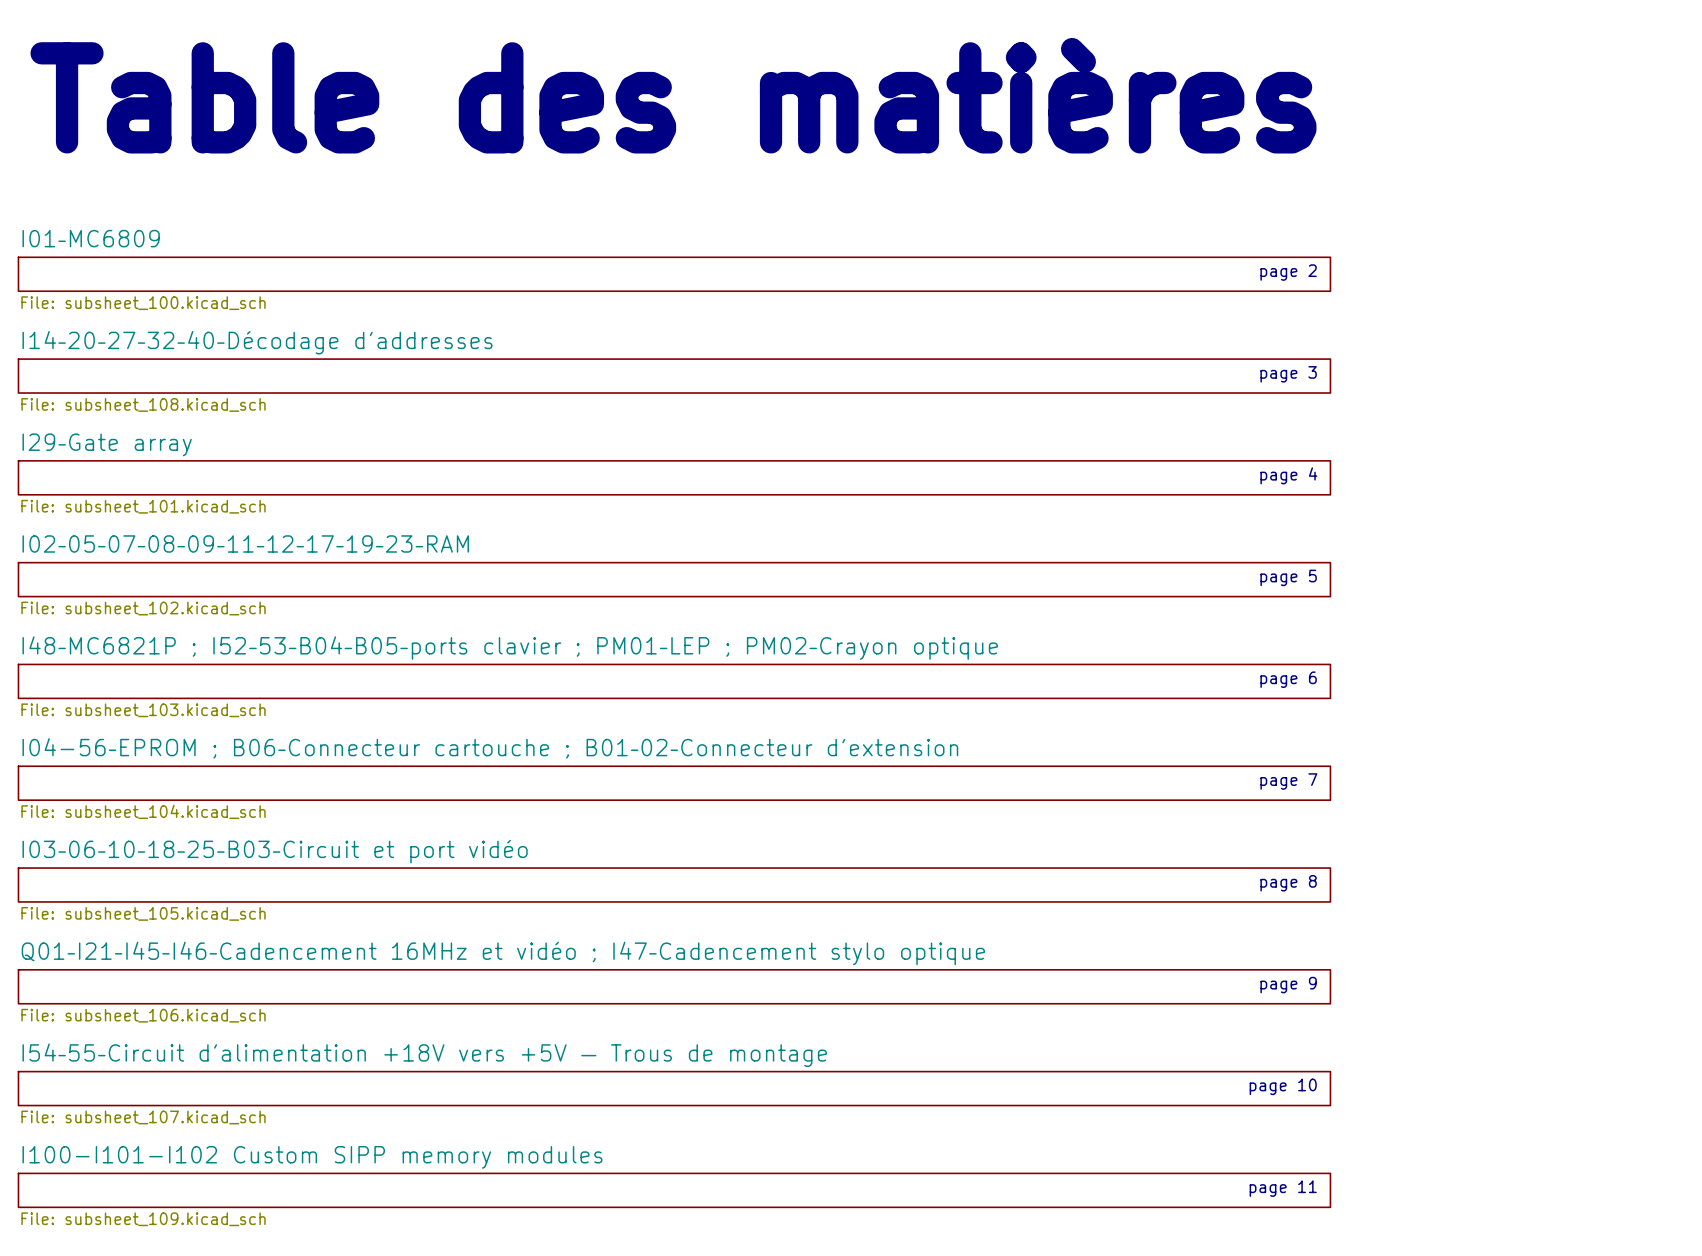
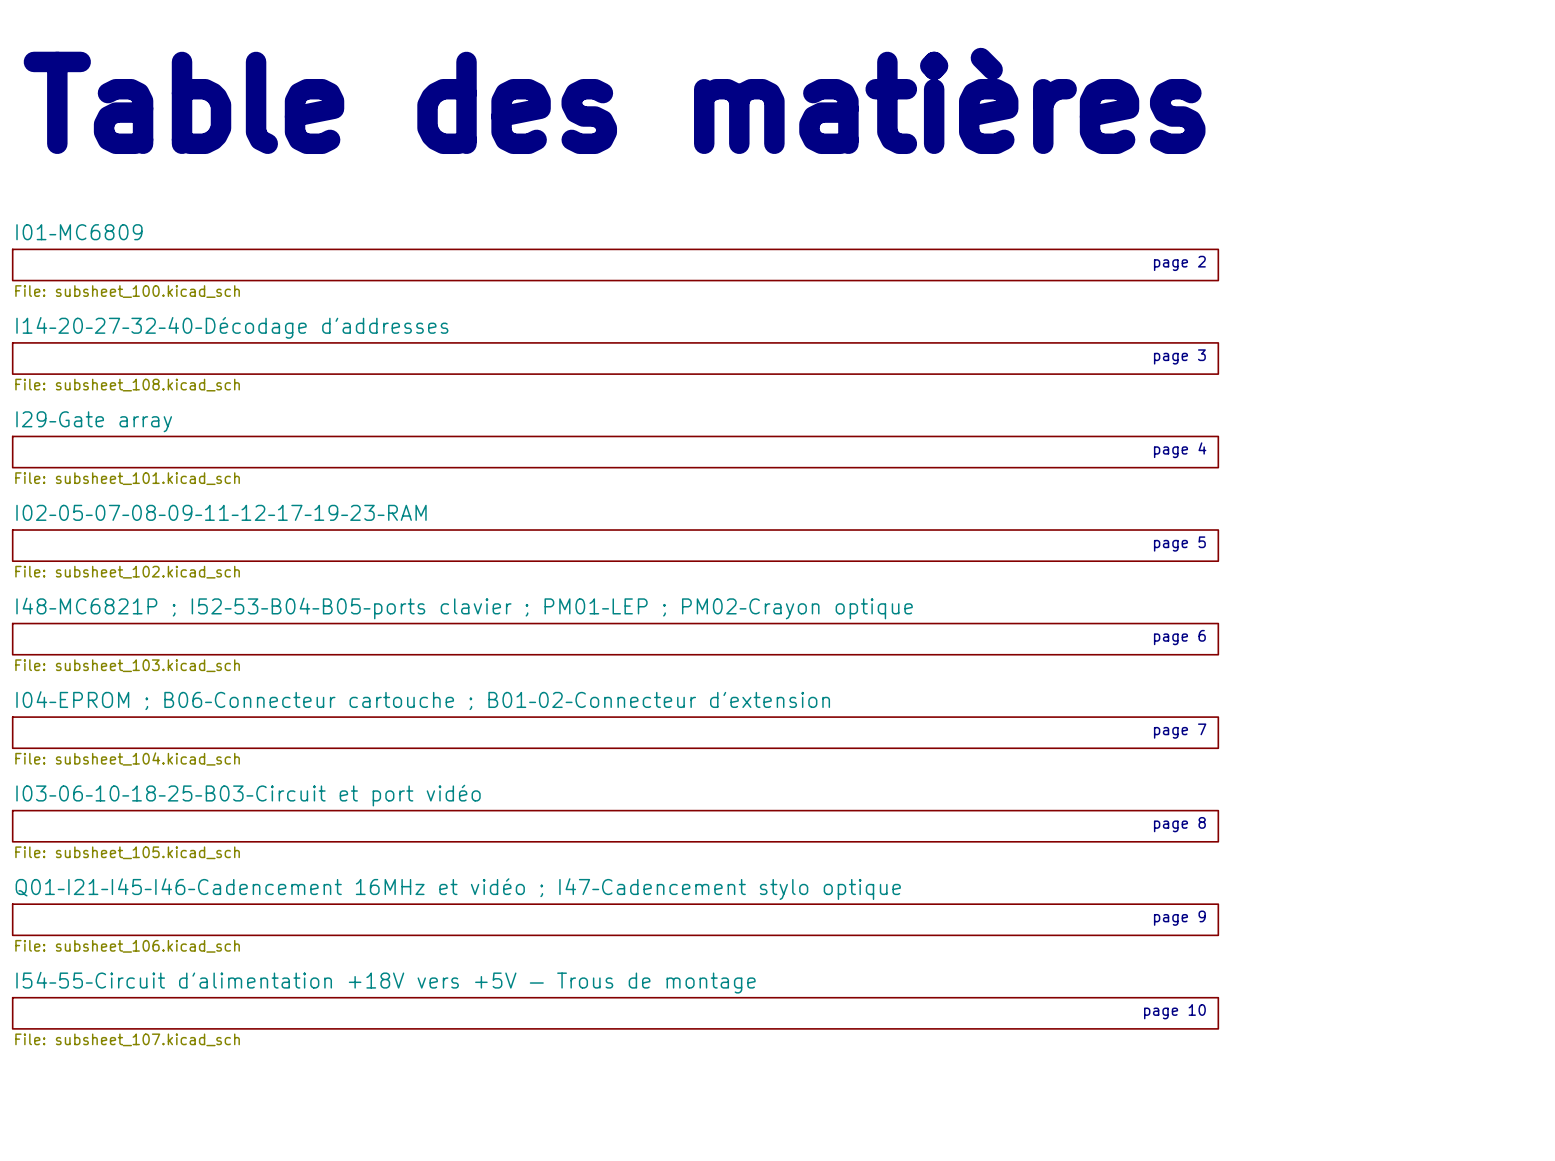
sheet I04-56–EPROM ; B06–Connecteur cartouche ; B01–02–Connecteur d'extension name: I04-56–EPROM ; B06–Connecteur cartouche ; B01–02–Connecteur d'extension (490, 748) -> I04–EPROM ; B06–Connecteur cartouche ; B01–02–Connecteur d'extension (423, 700)
text: page 11 (1283, 1188) -> none
sheet I100-I101-I102 Custom SIPP memory modules: File: subsheet_109.kicad_sch (674, 1190) -> none

